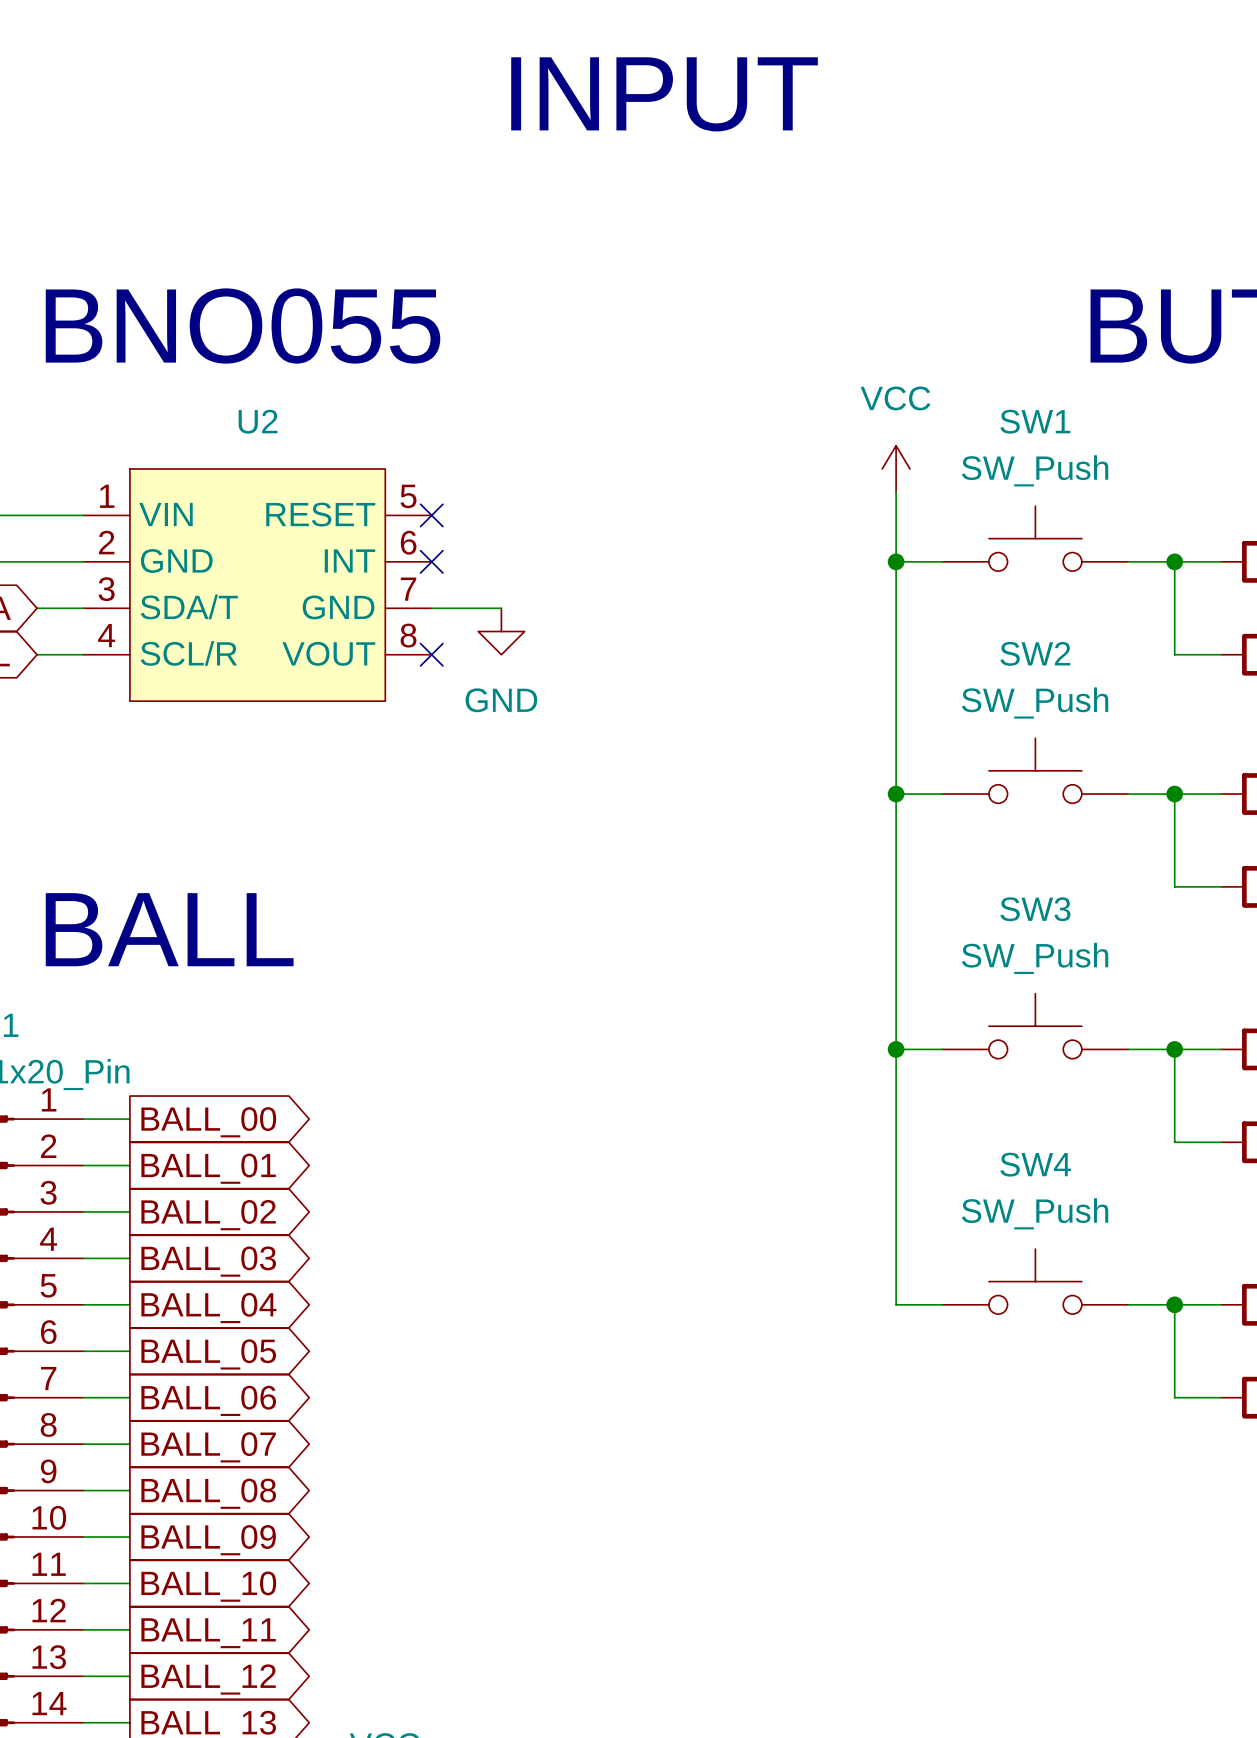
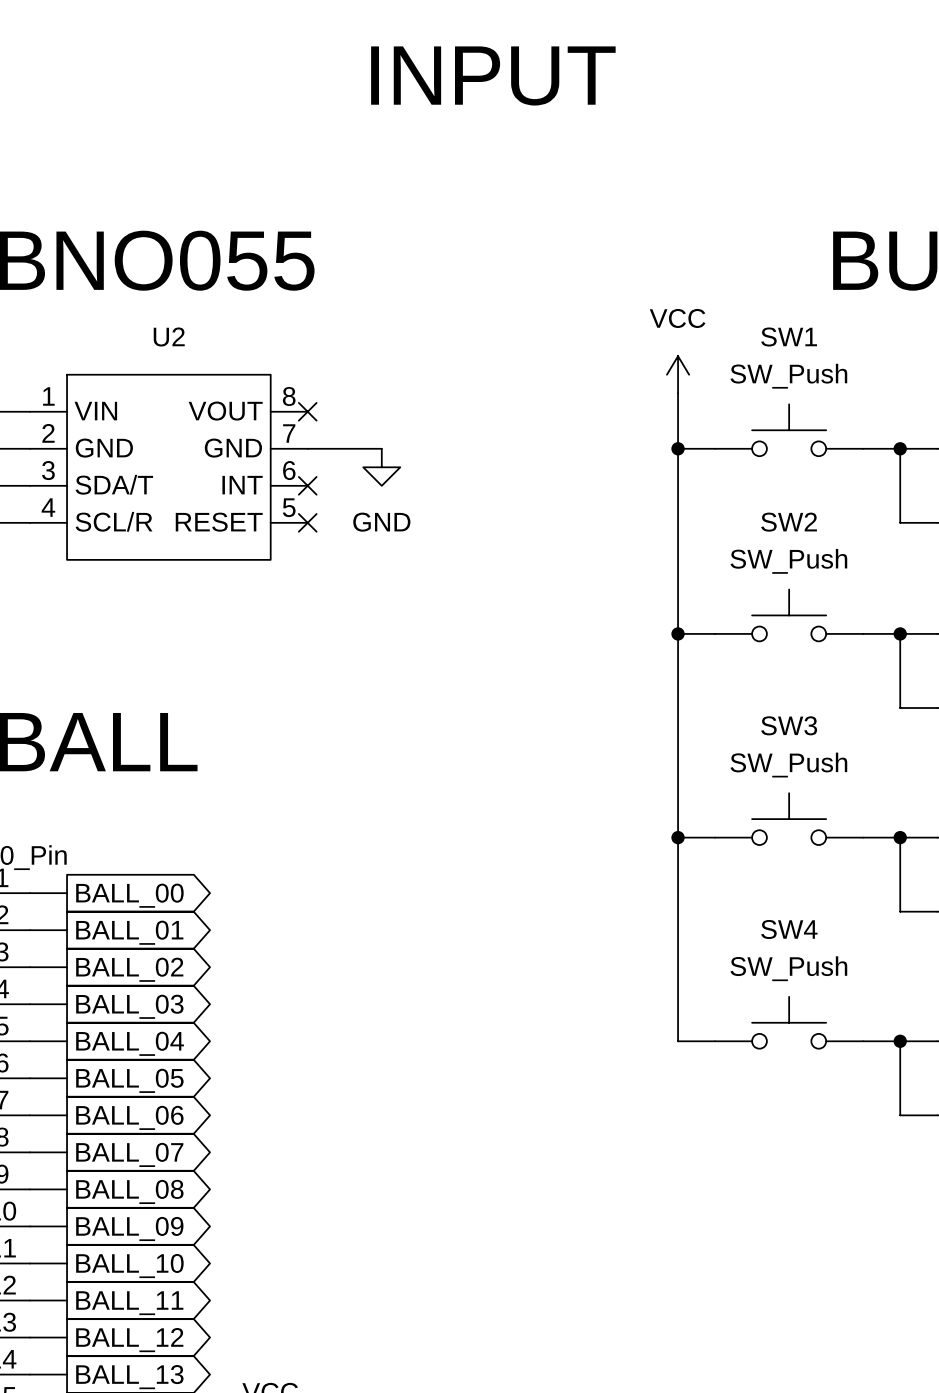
U2 pin number: 5 (408, 496) -> 8 (289, 396)
U2 pin name: RESET (320, 514) -> VOUT (225, 411)
U2 pin number: 6 (408, 542) -> 7 (289, 433)
U2 pin name: INT (350, 560) -> GND (233, 448)
wire: none -> (307, 448) (381, 448)
no-connect mark position: (431, 561) -> (307, 485)
U2 pin number: 7 (408, 589) -> 6 (289, 470)
U2 pin name: GND (338, 607) -> INT (242, 485)
wire: (431, 608) (501, 608) -> none
power symbol position: GND (501, 631) -> GND (381, 467)
U2 pin number: 8 (408, 635) -> 5 (289, 507)
U2 pin name: VOUT (328, 653) -> RESET (219, 522)

